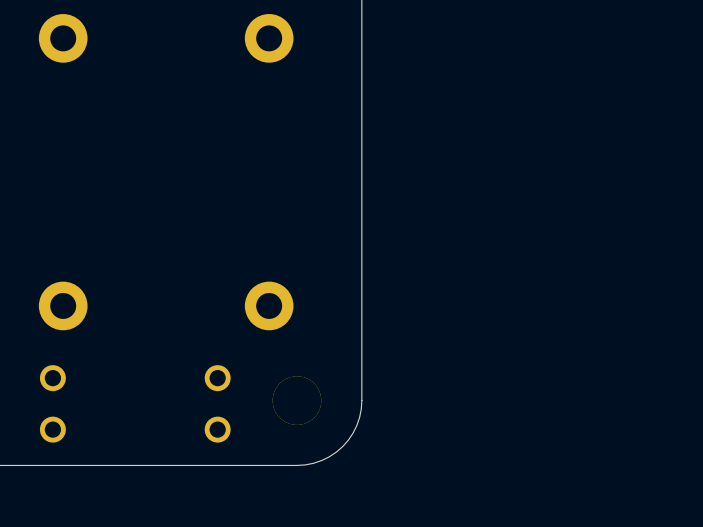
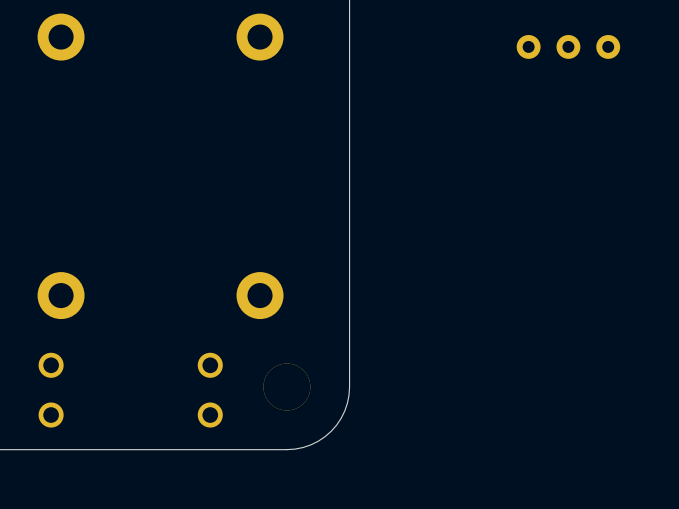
part: none -> (568, 46)

